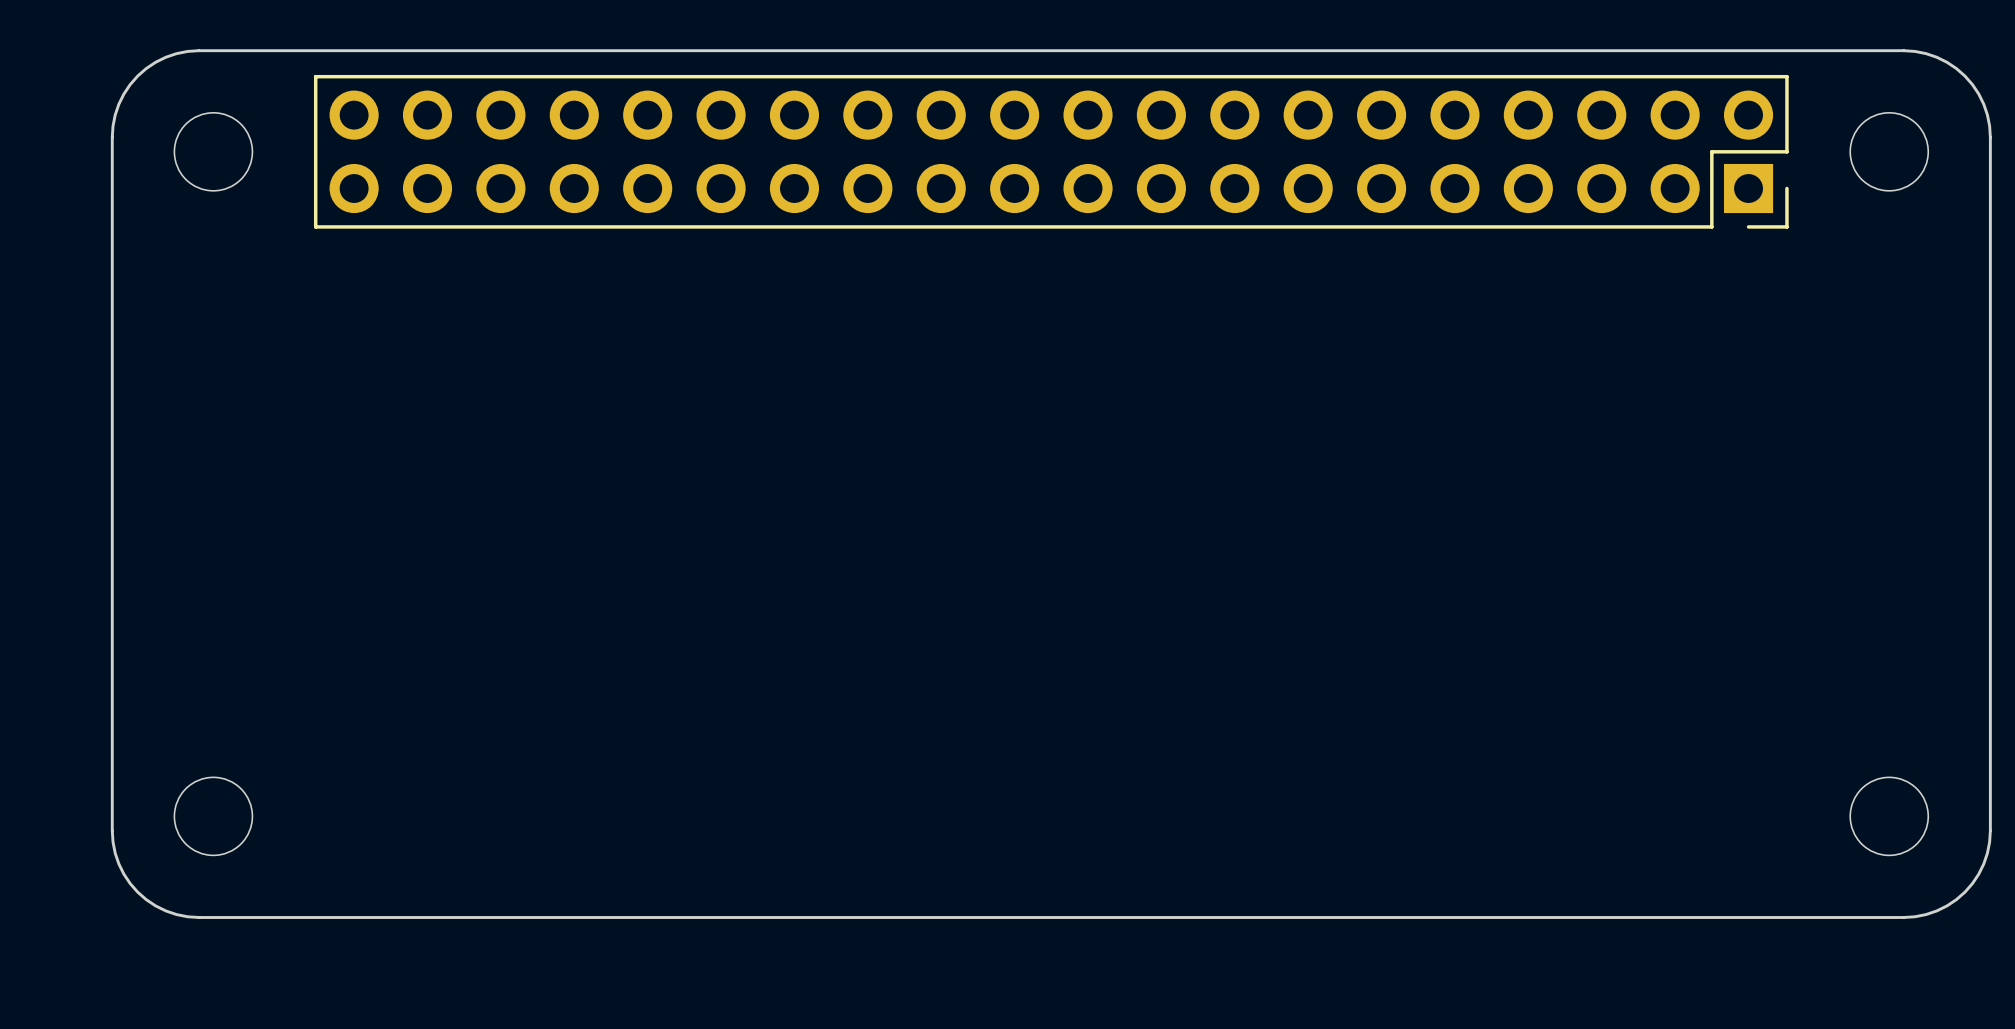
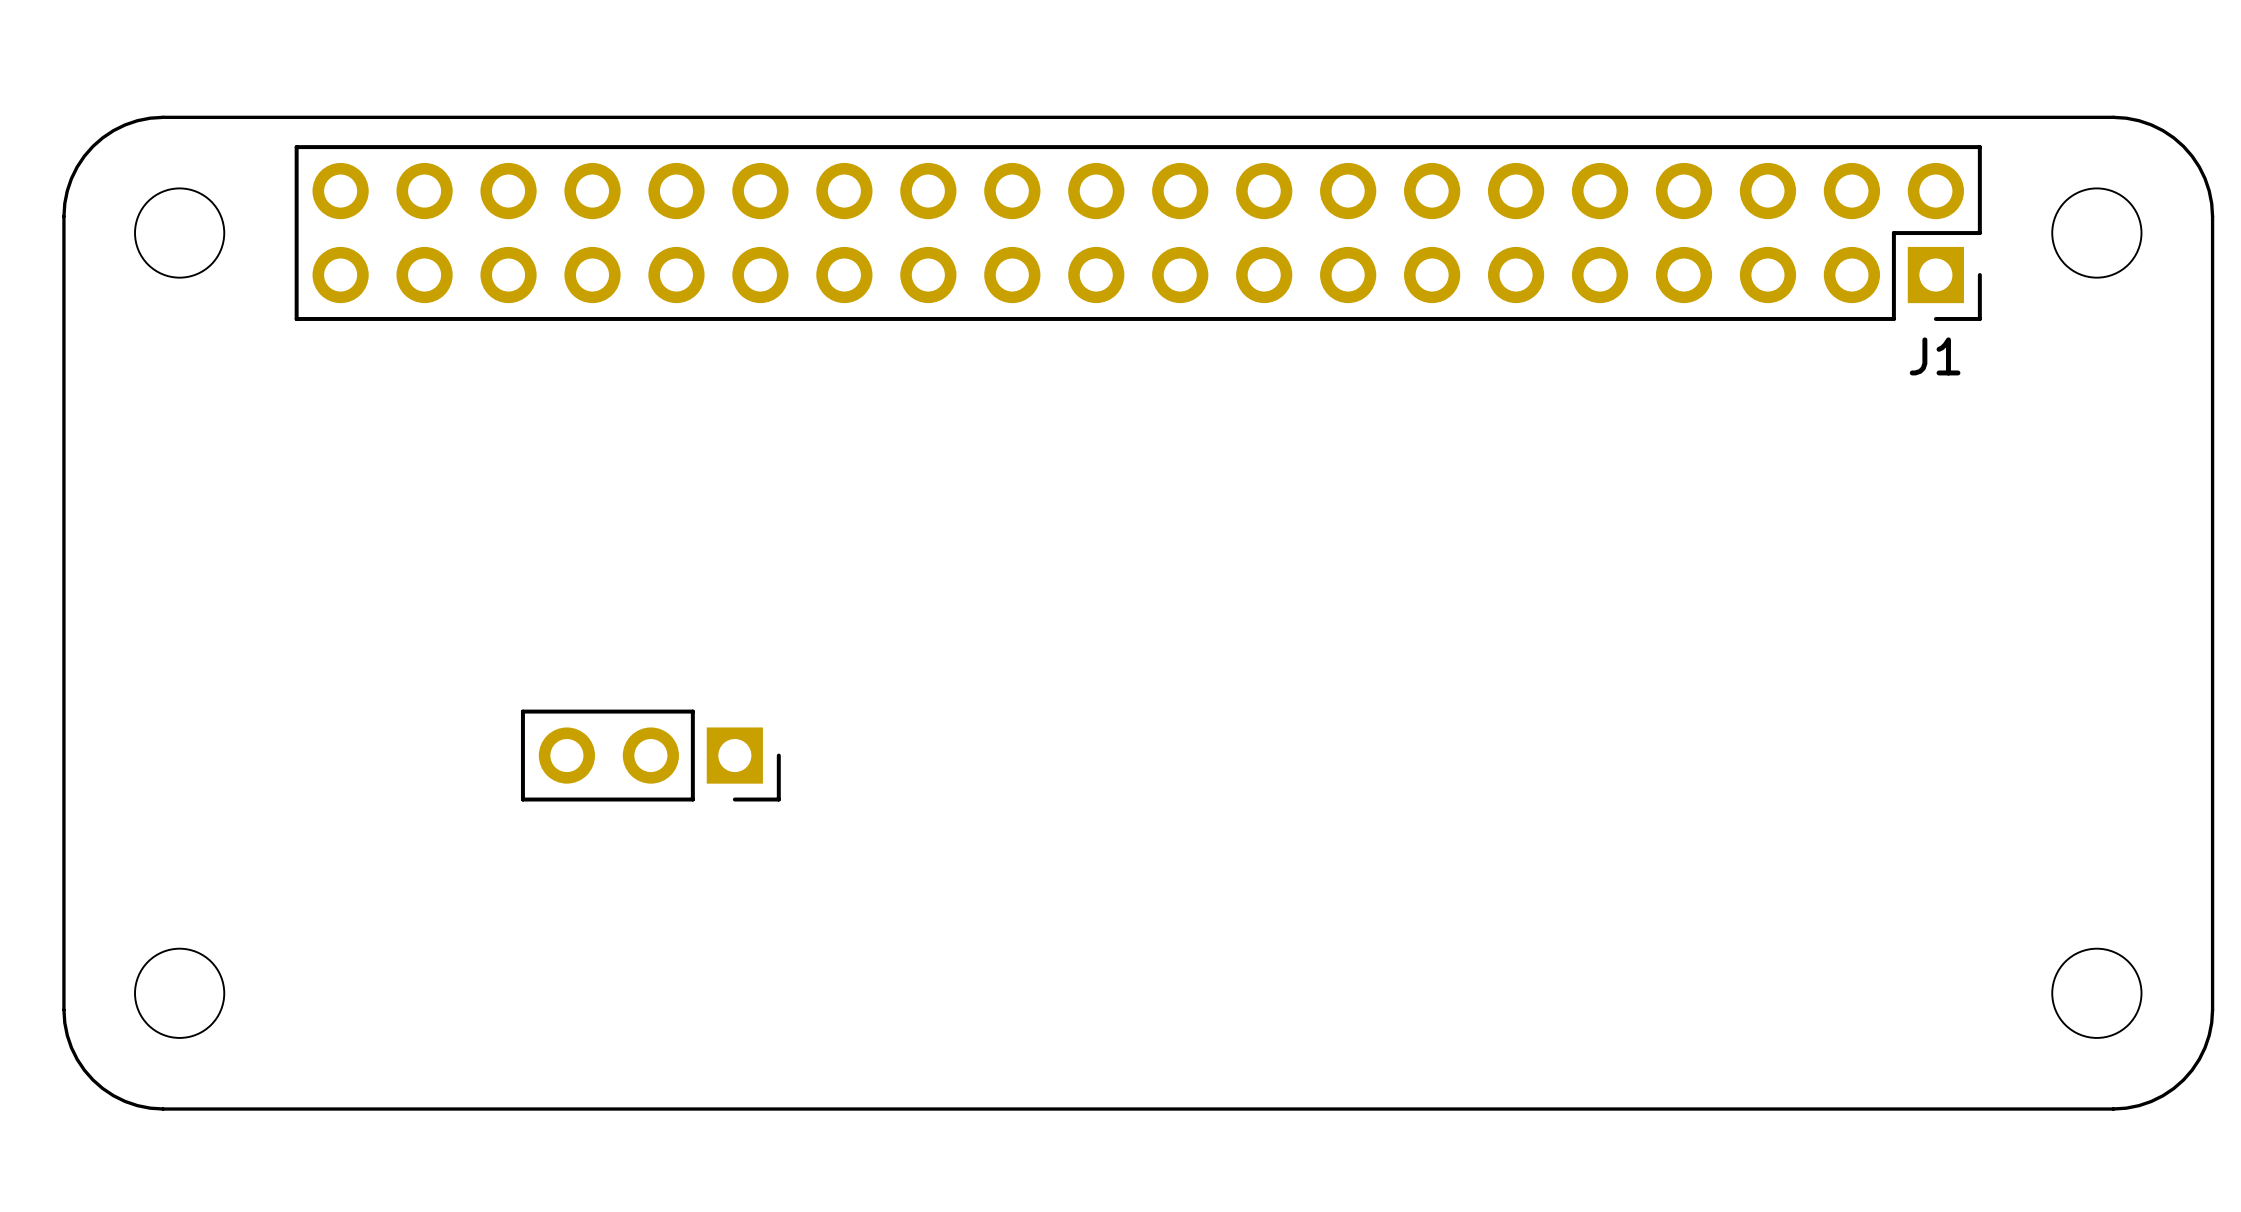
J1 name: none -> J1 (1935, 356)
part: none -> (650, 755)

